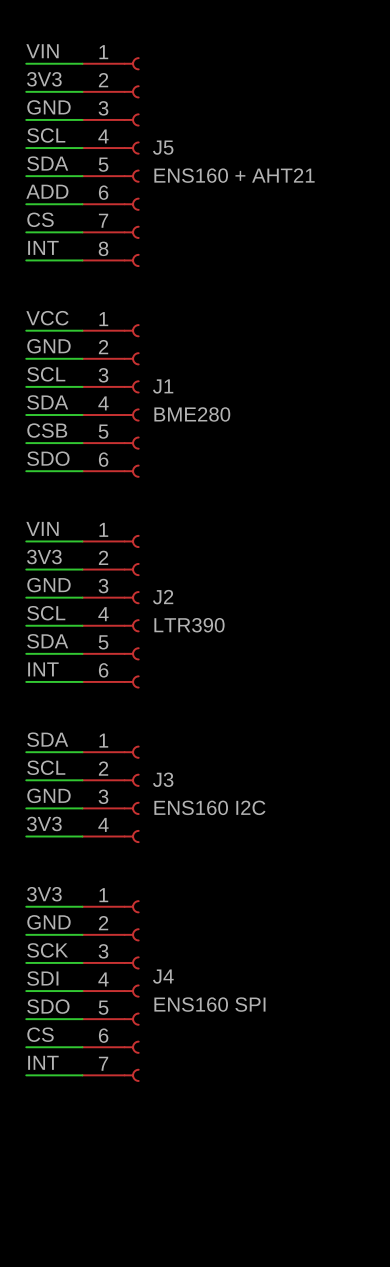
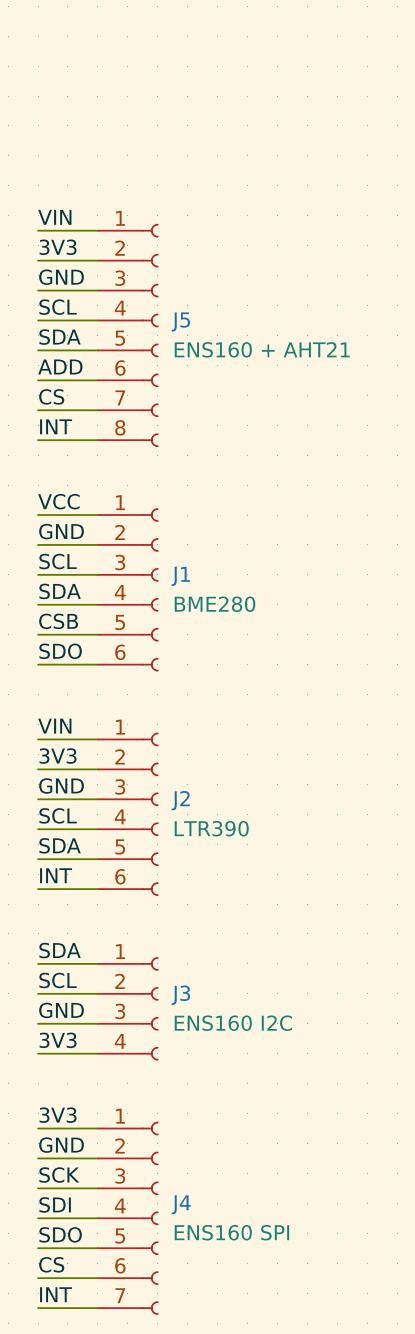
label position: VIN (42, 51) -> VIN (54, 217)
wire: (26, 63) (82, 63) -> none
label position: 3V3 (44, 79) -> 3V3 (58, 247)
wire: (26, 91) (82, 91) -> none
label position: GND (48, 107) -> GND (61, 277)
wire: (26, 119) (82, 119) -> none
label position: SCL (46, 135) -> SCL (58, 307)
wire: (26, 148) (82, 148) -> none
J5 position: (110, 162) -> (128, 335)
label: SDA (47, 163) -> none
wire: (26, 176) (82, 176) -> (38, 230) (97, 230)
label: ADD (47, 191) -> none
wire: (26, 204) (82, 204) -> (38, 260) (97, 260)
label: CS (40, 219) -> none
wire: (26, 232) (82, 232) -> (38, 290) (97, 290)
label: INT (43, 247) -> none
wire: (26, 260) (82, 260) -> (38, 320) (97, 320)
label: VCC (47, 318) -> SDA (60, 337)
label: GND (48, 346) -> ADD (60, 366)
label: SCL (46, 374) -> CS (51, 396)
J1 position: (110, 400) -> (128, 589)
label: SDA (47, 402) -> INT (56, 426)
label: CSB (47, 430) -> none
wire: (26, 443) (82, 443) -> (38, 515) (97, 515)
label: SDO (48, 458) -> none
wire: (26, 471) (82, 471) -> (38, 544) (97, 544)
label: none -> VCC (58, 501)
label: none -> GND (61, 531)
label: VIN (42, 528) -> SCL (58, 561)
label: 3V3 (44, 557) -> SDA (60, 591)
label: GND (48, 585) -> CSB (58, 621)
J2 position: (110, 611) -> (128, 814)
label: SCL (46, 613) -> SDO (60, 651)
label: SDA (47, 641) -> none
wire: (26, 653) (82, 653) -> (38, 739) (97, 739)
label: INT (43, 669) -> VIN (54, 726)
wire: (26, 681) (82, 681) -> (38, 769) (97, 769)
label: none -> 3V3 (58, 756)
label: SDA (47, 739) -> GND (61, 785)
J3 position: (110, 794) -> (128, 1008)
label: GND (48, 795) -> SDA (60, 845)
label: 3V3 (44, 823) -> INT (56, 875)
label: 3V3 (44, 894) -> SDA (60, 950)
label: GND (48, 922) -> SCL (58, 980)
label: SCK (47, 950) -> GND (61, 1010)
label: SDI (42, 978) -> 3V3 (58, 1040)
J4 position: (110, 991) -> (128, 1218)
label position: SDO (48, 1006) -> SDO (60, 1234)
wire: (26, 1019) (82, 1019) -> (38, 1128) (97, 1128)
label position: CS (40, 1034) -> CS (51, 1264)
wire: (26, 1047) (82, 1047) -> (38, 1158) (97, 1158)
label: none -> 3V3 (58, 1115)
label position: INT (43, 1062) -> INT (56, 1294)
wire: (26, 1075) (82, 1075) -> (38, 1188) (97, 1188)
label: none -> GND (61, 1145)
label: none -> SCK (59, 1175)
label: none -> SDI (55, 1204)
wire: none -> (38, 1218) (97, 1218)
wire: none -> (38, 1248) (97, 1248)
wire: none -> (38, 1278) (97, 1278)
wire: none -> (38, 1308) (97, 1308)

